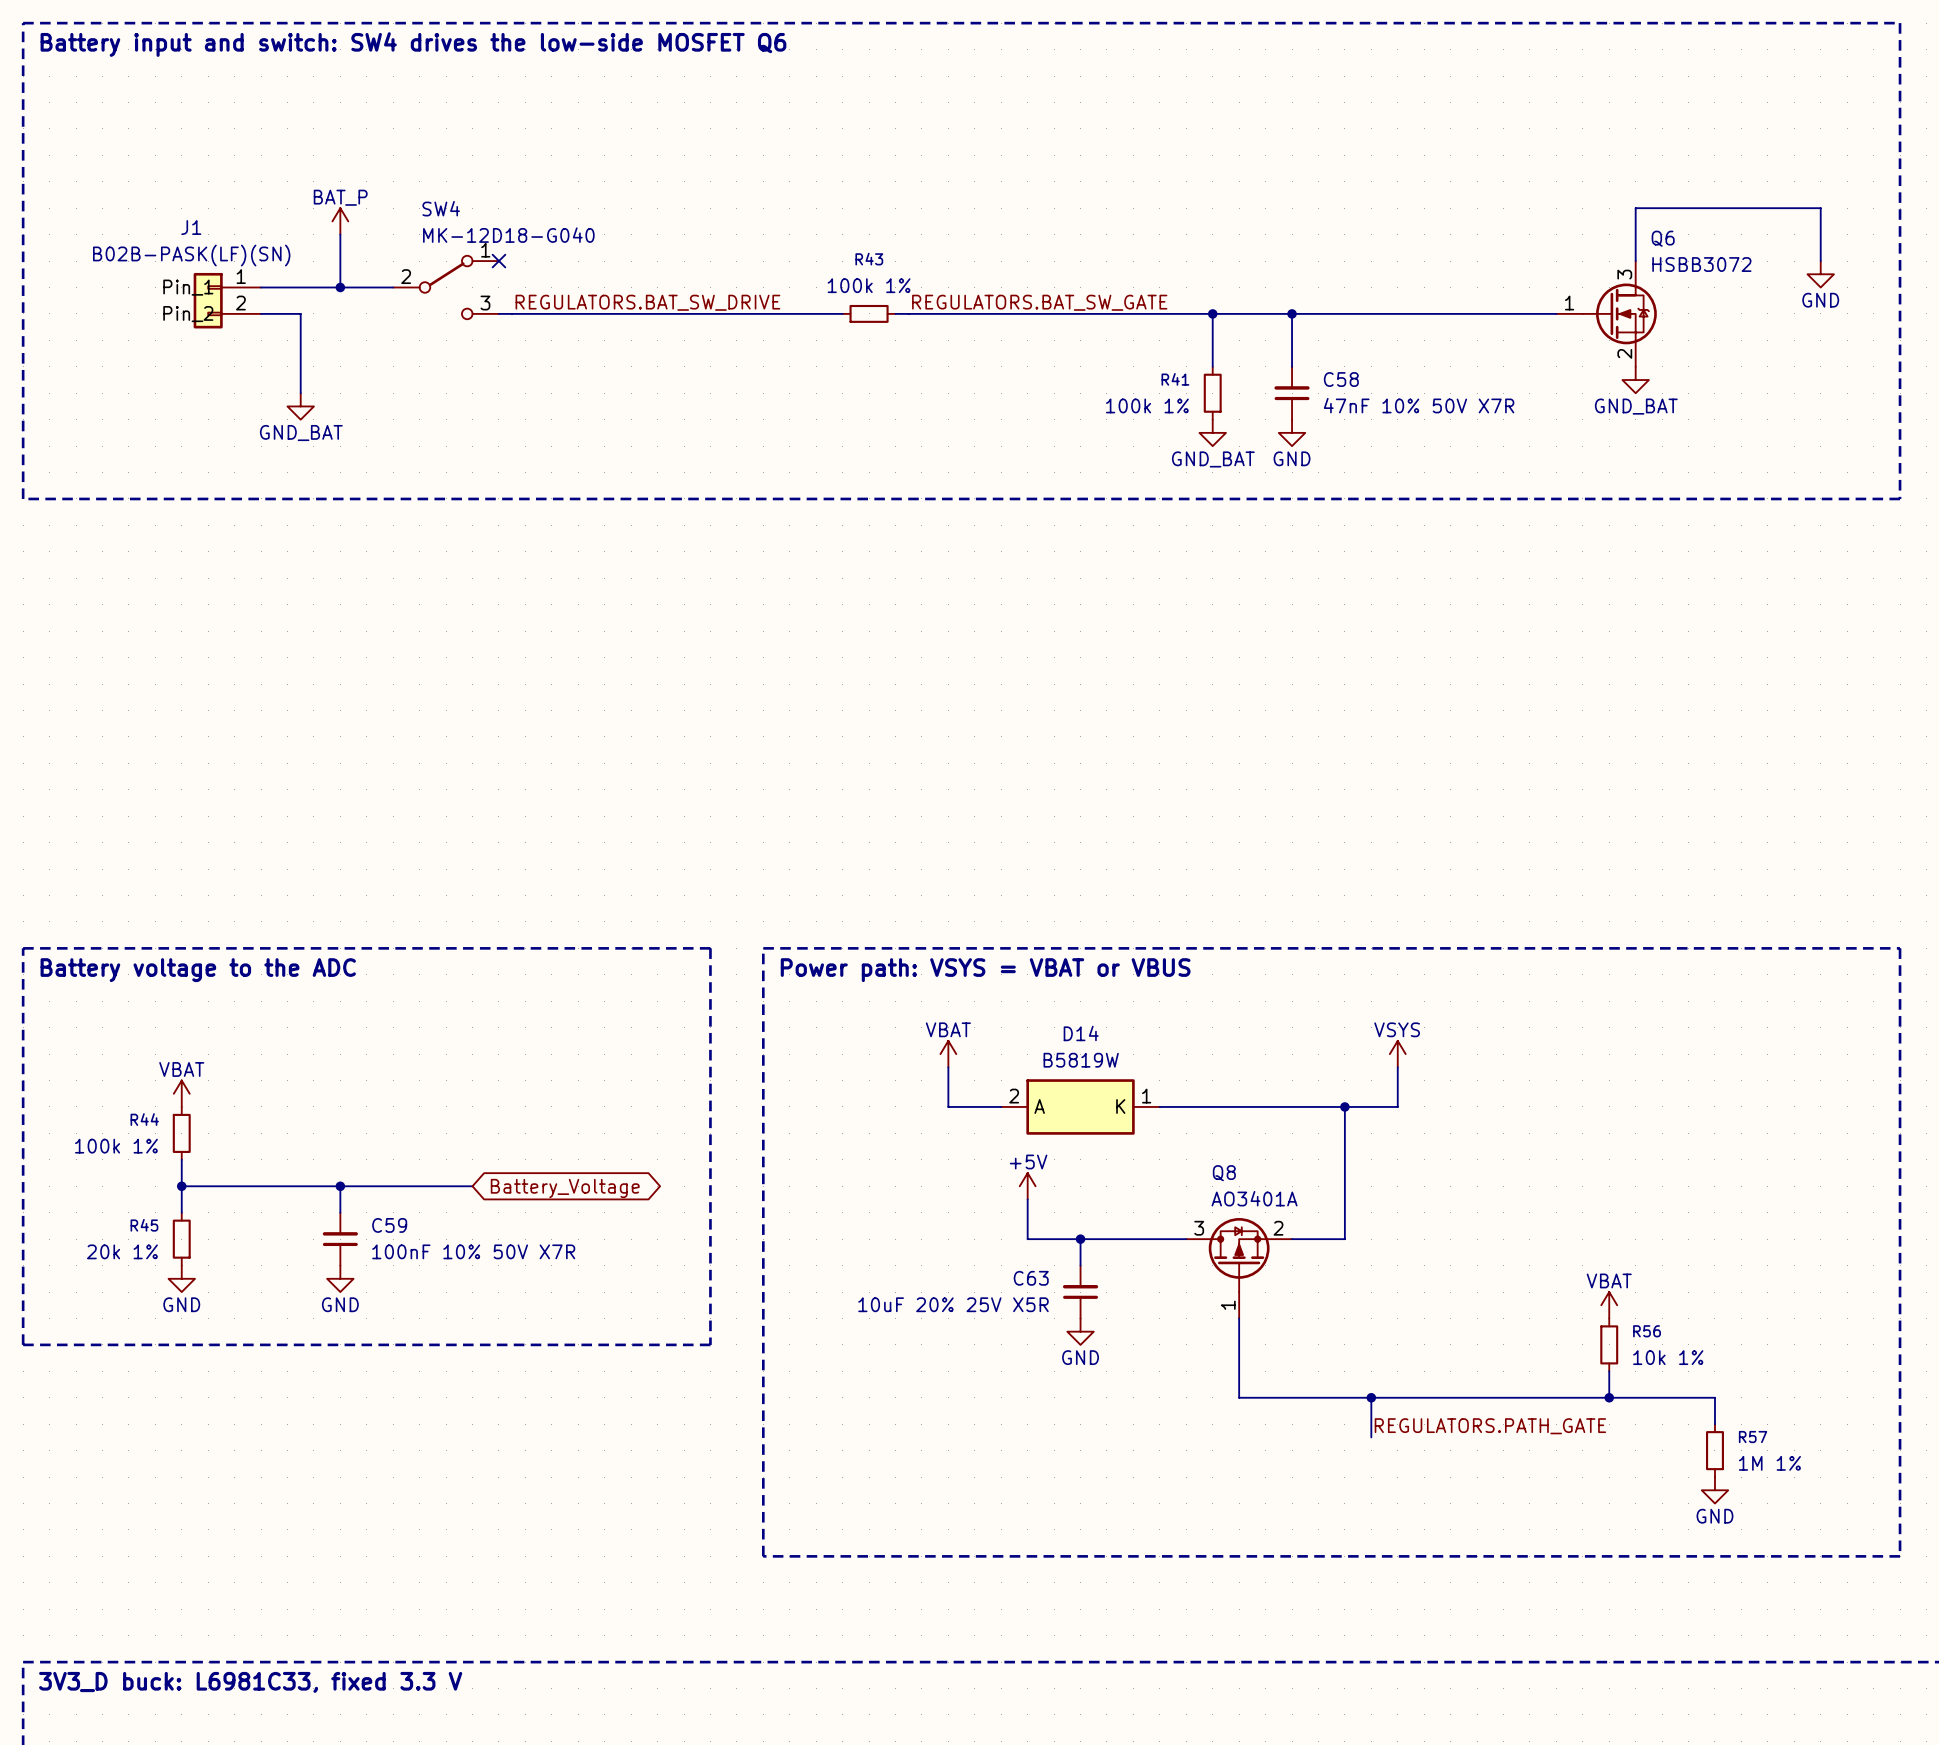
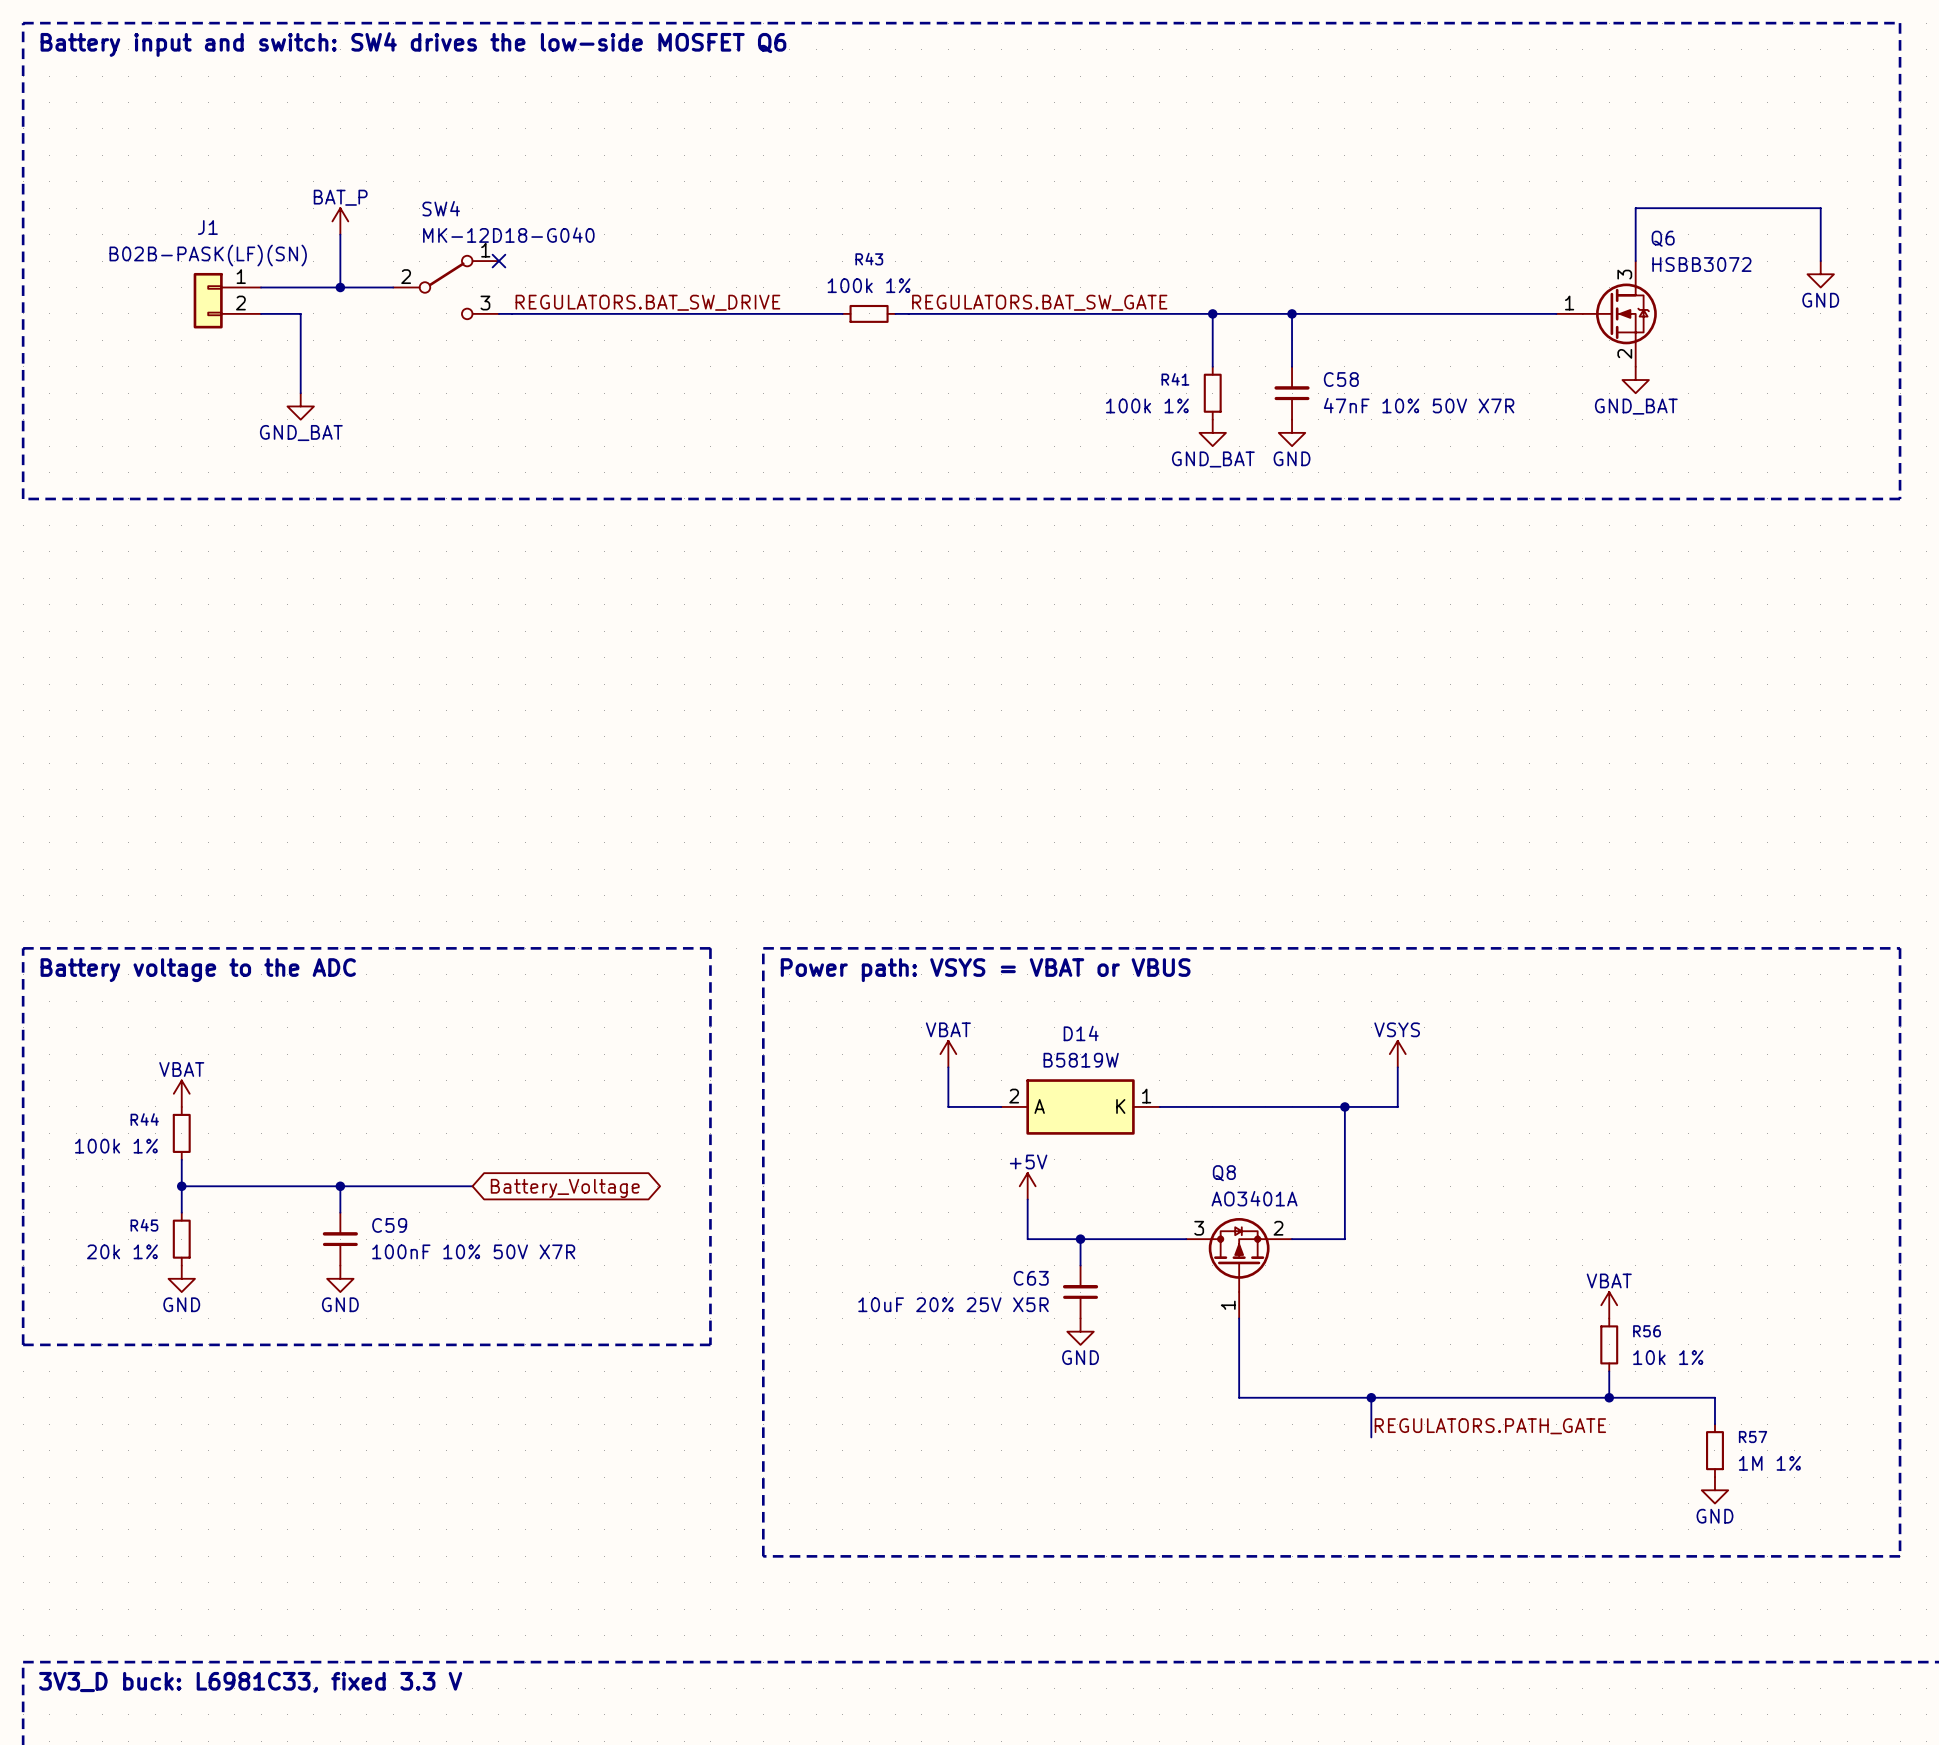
J1 name position: J1 (191, 227) -> J1 (207, 227)
J1 value position: B02B-PASK(LF)(SN) (191, 255) -> B02B-PASK(LF)(SN) (208, 255)
J1 pin name: Pin_1 (188, 287) -> none
J1 pin name: Pin_2 (188, 314) -> none

